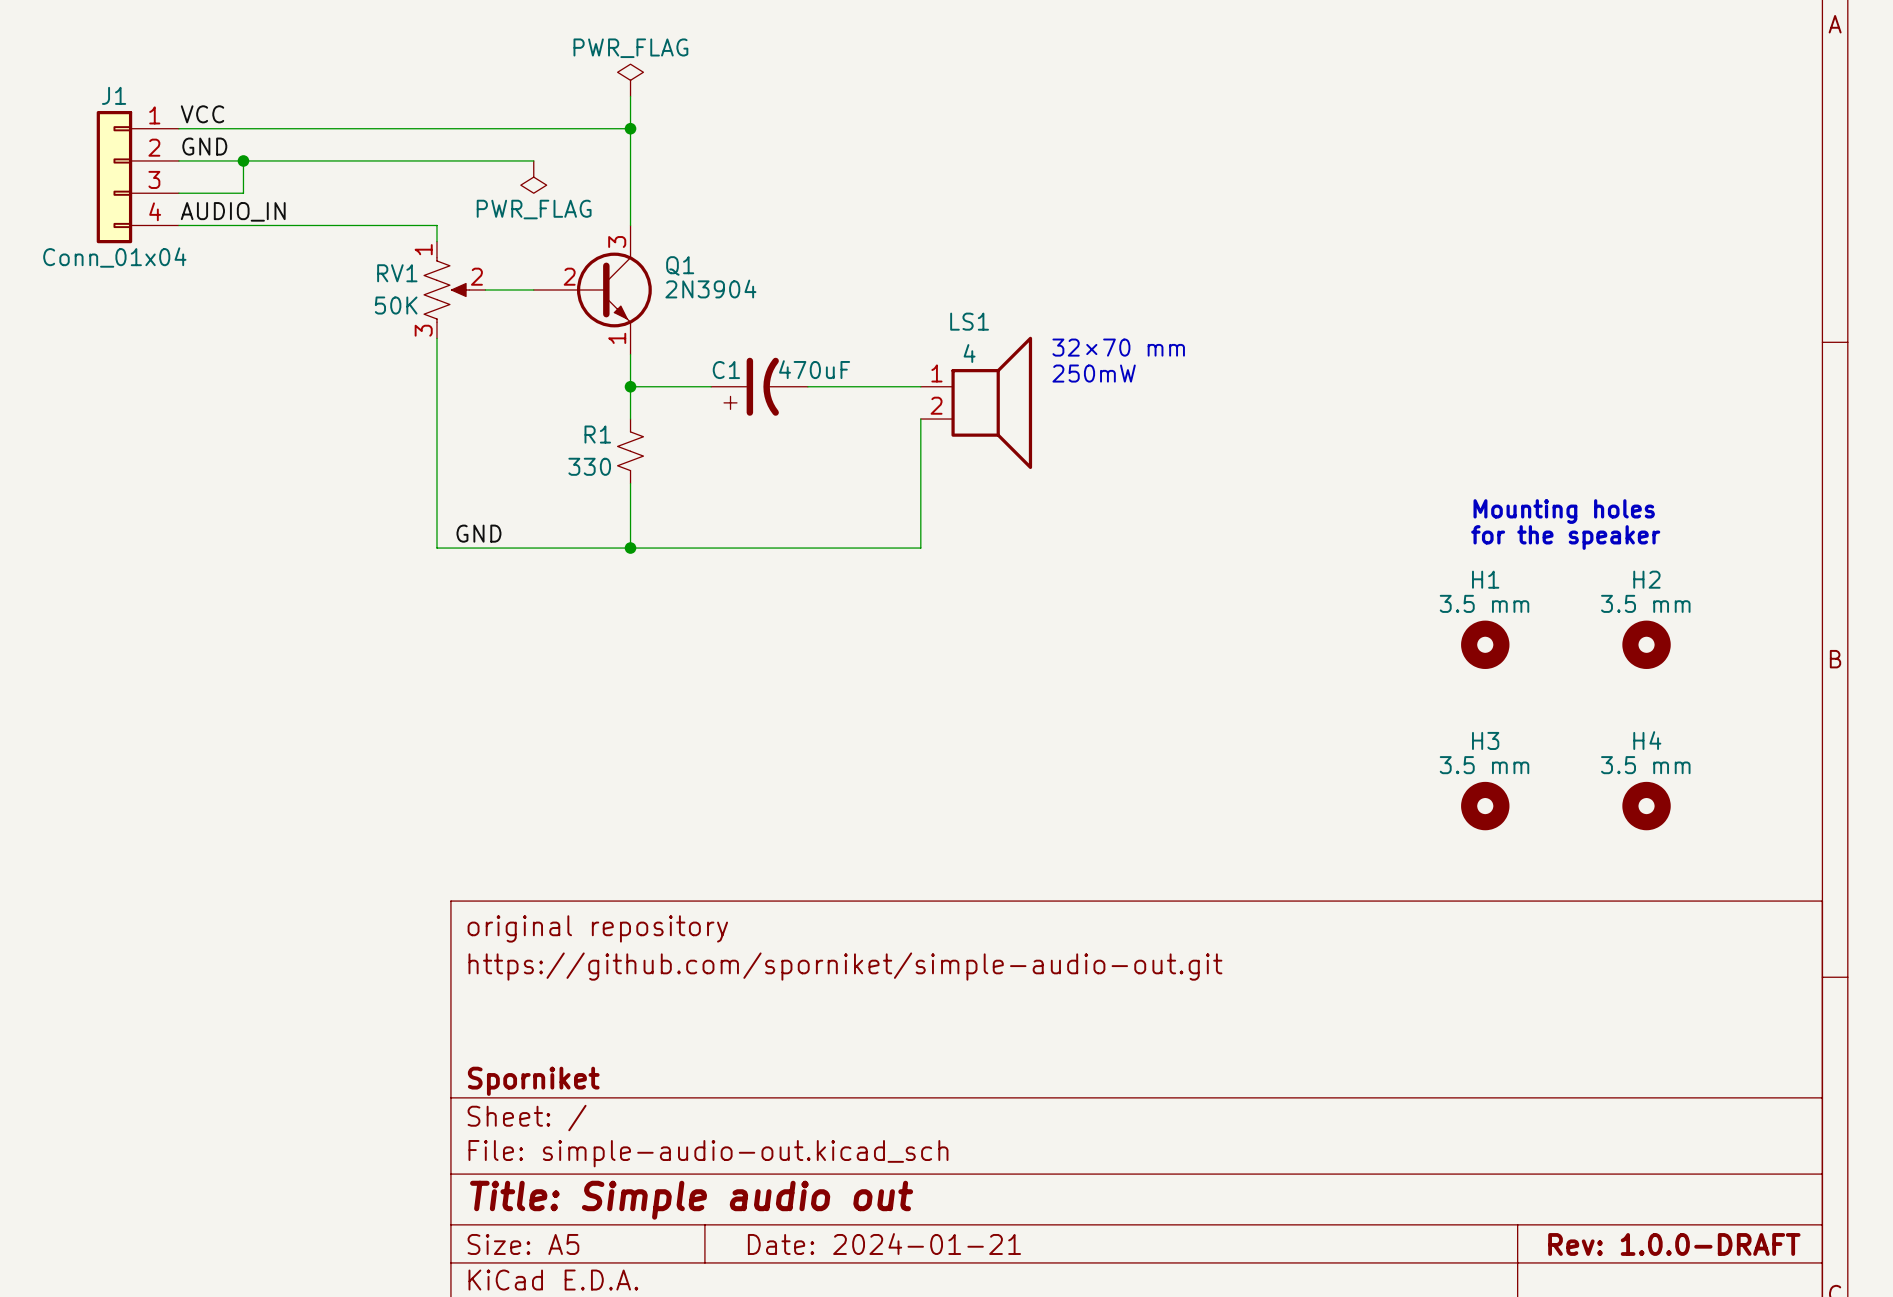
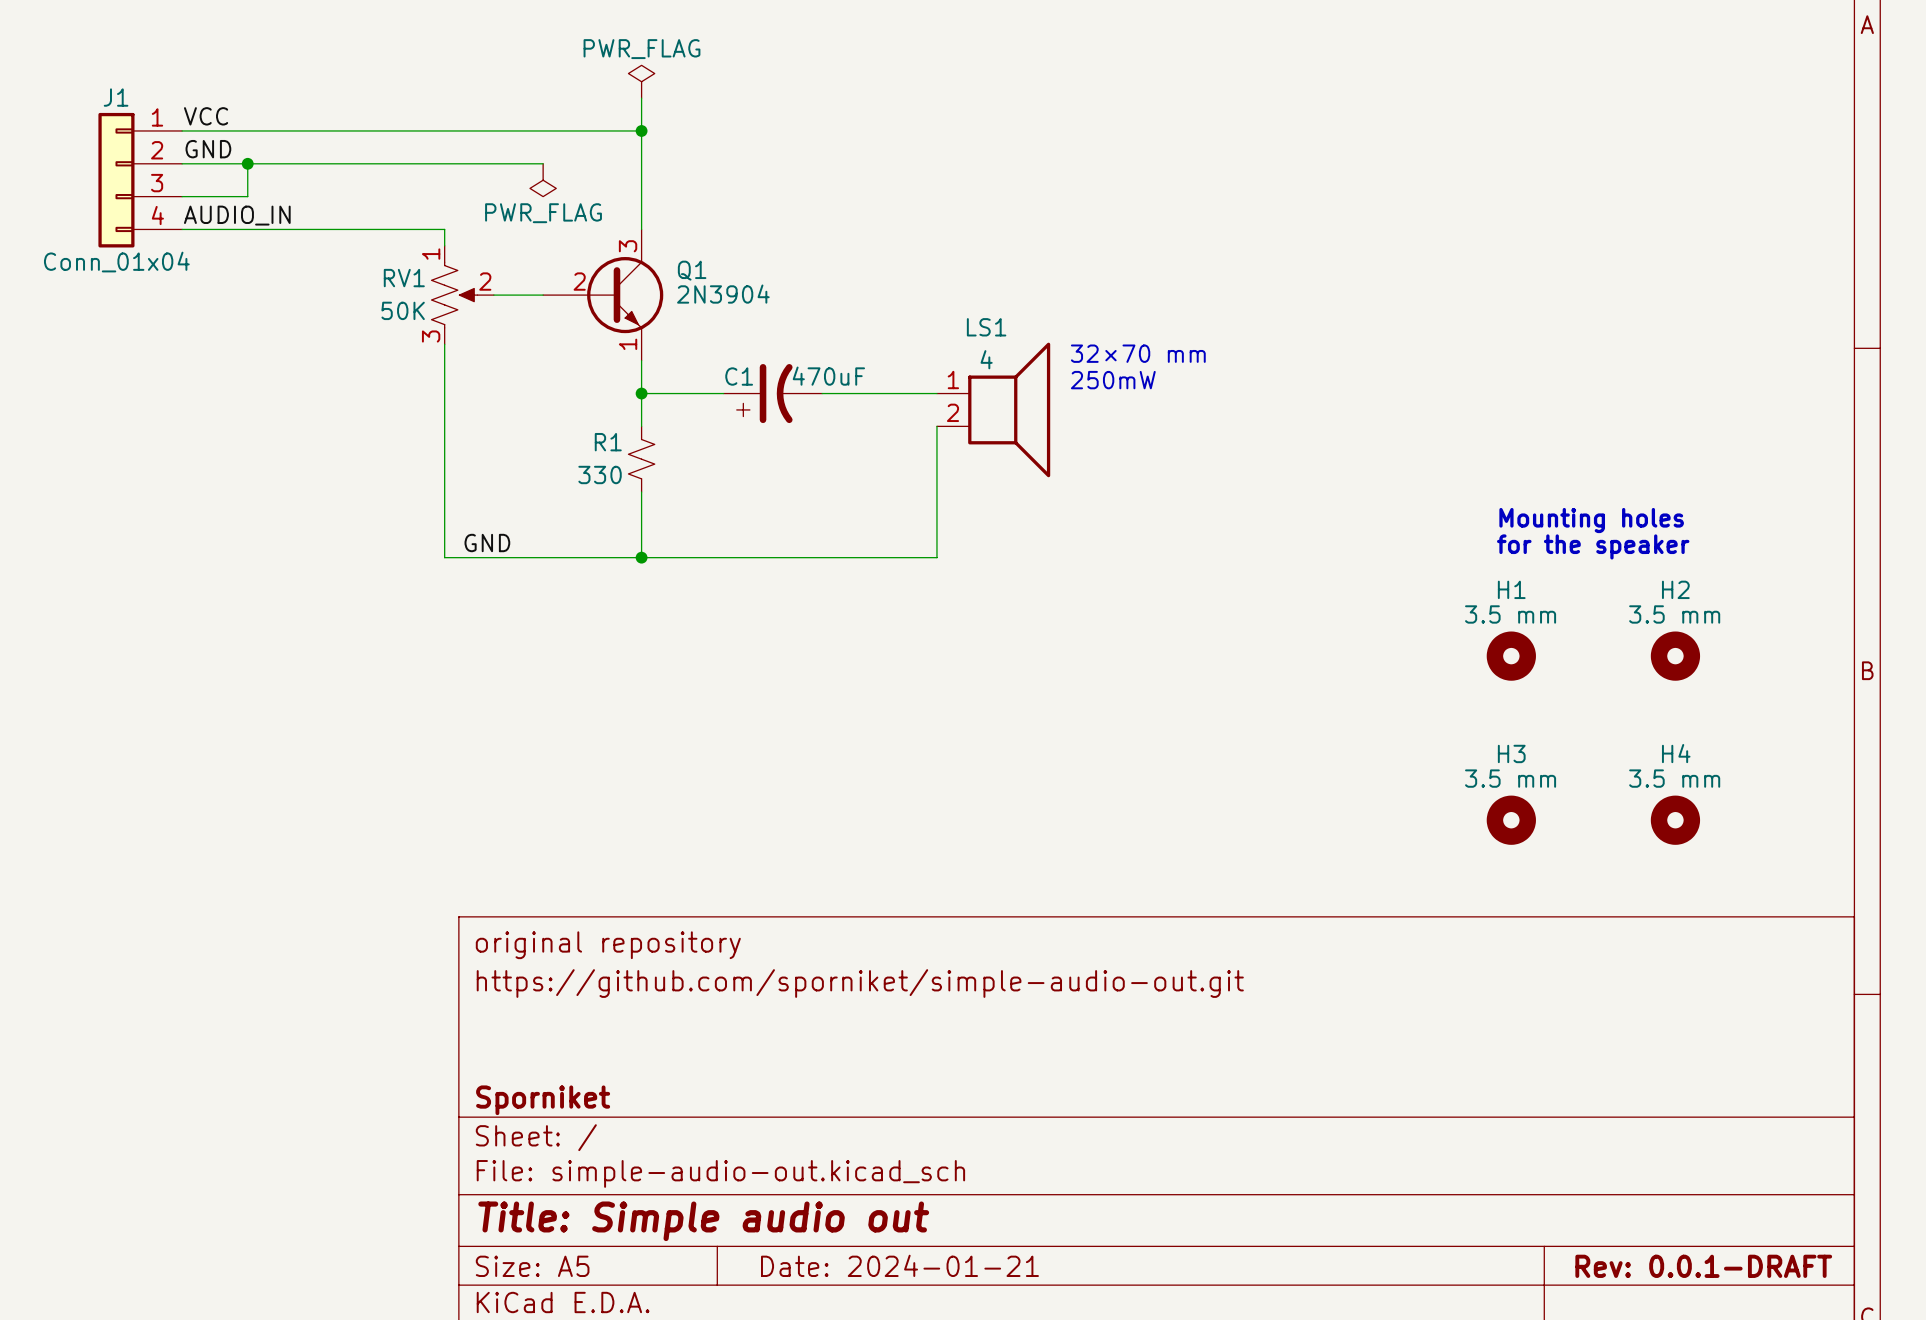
title block: Rev: 1.0.0-DRAFT (1674, 1244) -> Rev: 0.0.1-DRAFT (1703, 1266)

